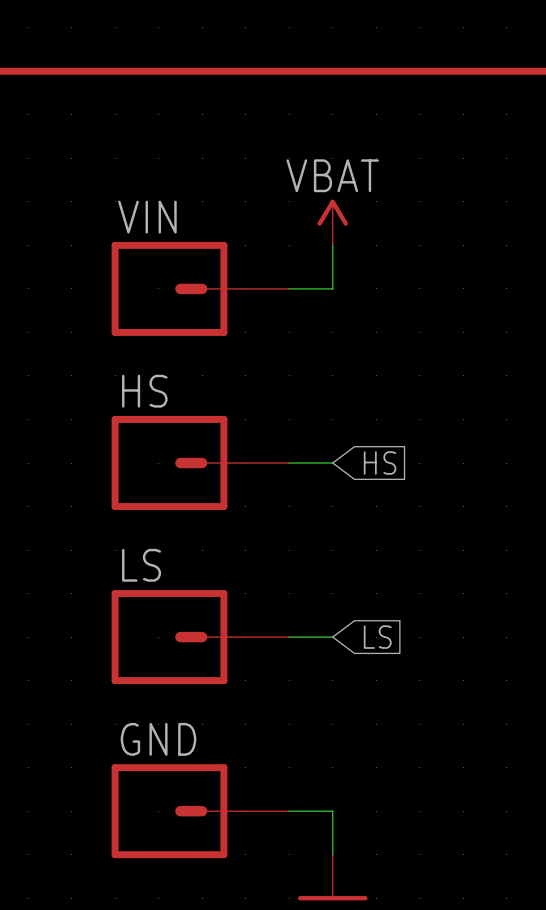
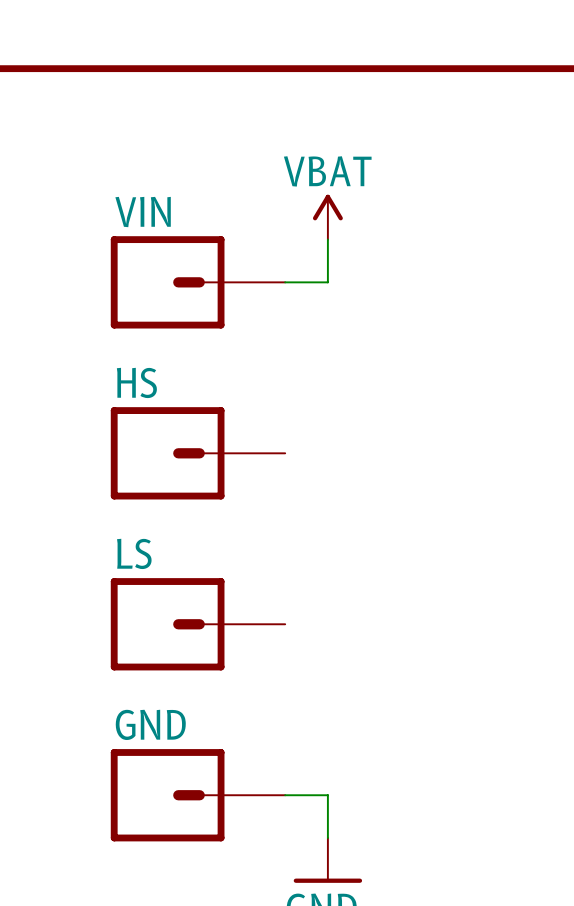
wire: (289, 463) (332, 463) -> none
global label: HS (380, 463) -> none
wire: (289, 637) (332, 637) -> none
global label: LS (377, 637) -> none

